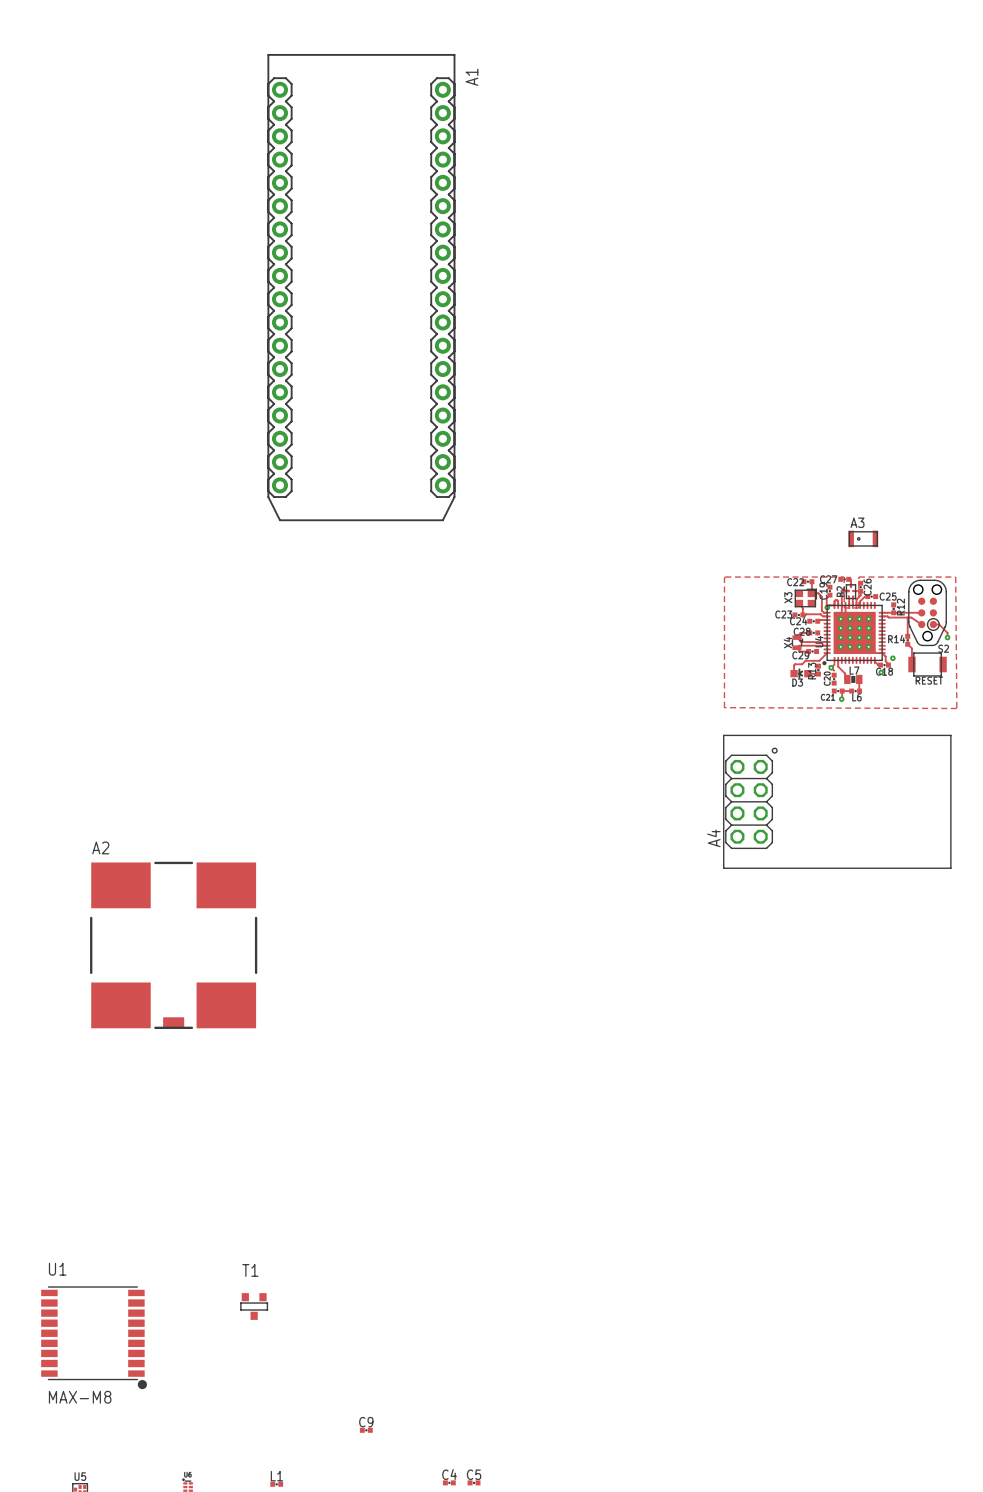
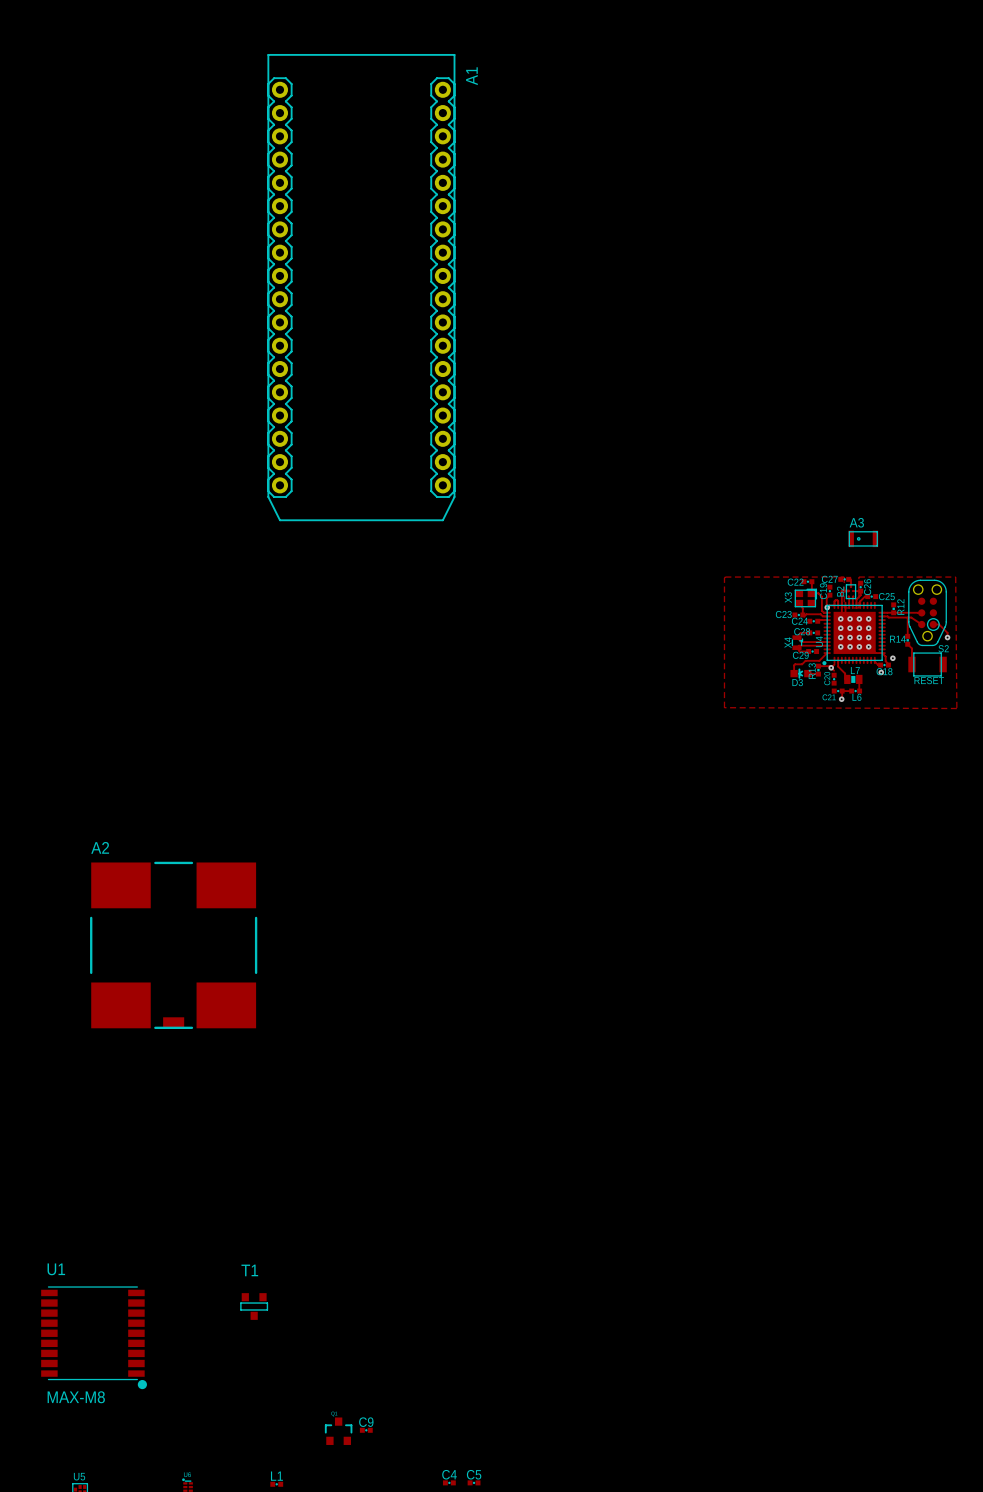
track: none -> (818, 666) (829, 666)
A4: (837, 801) -> none
part: none -> (338, 1431)

